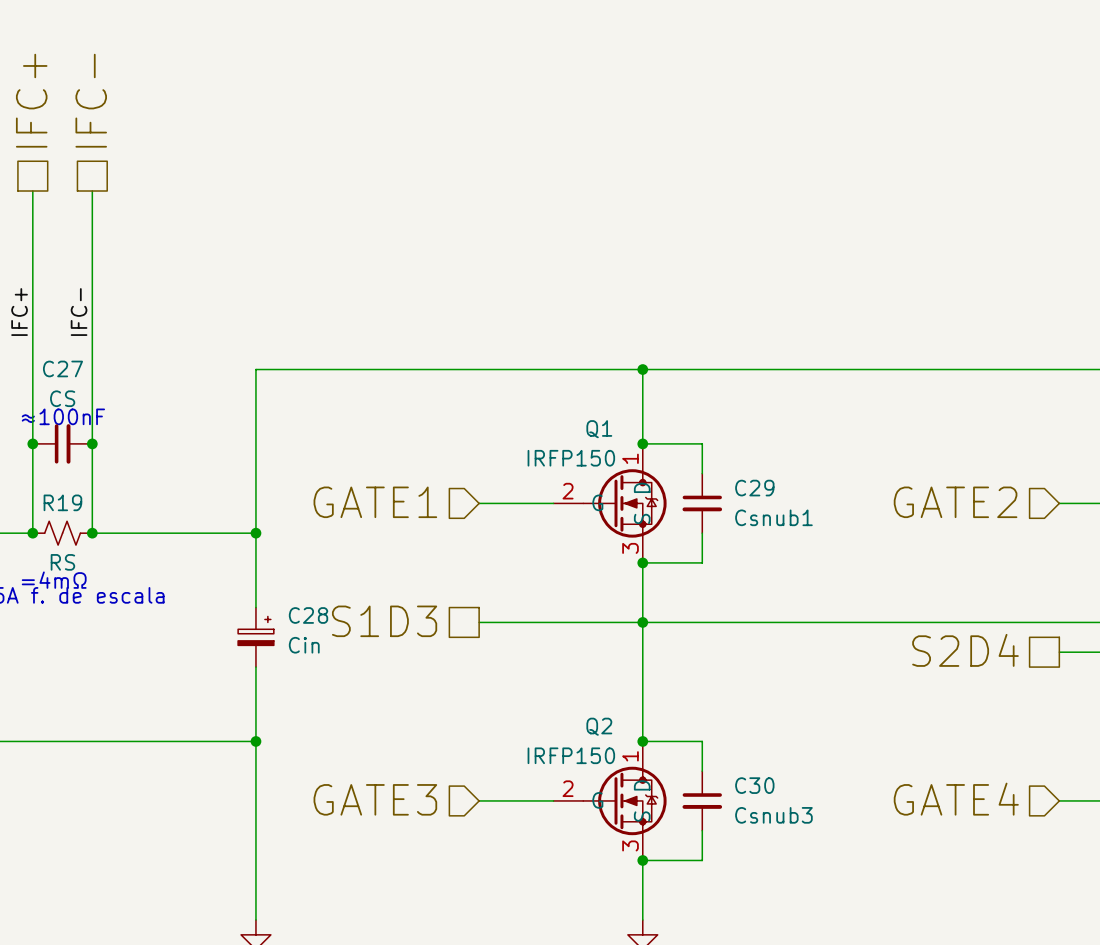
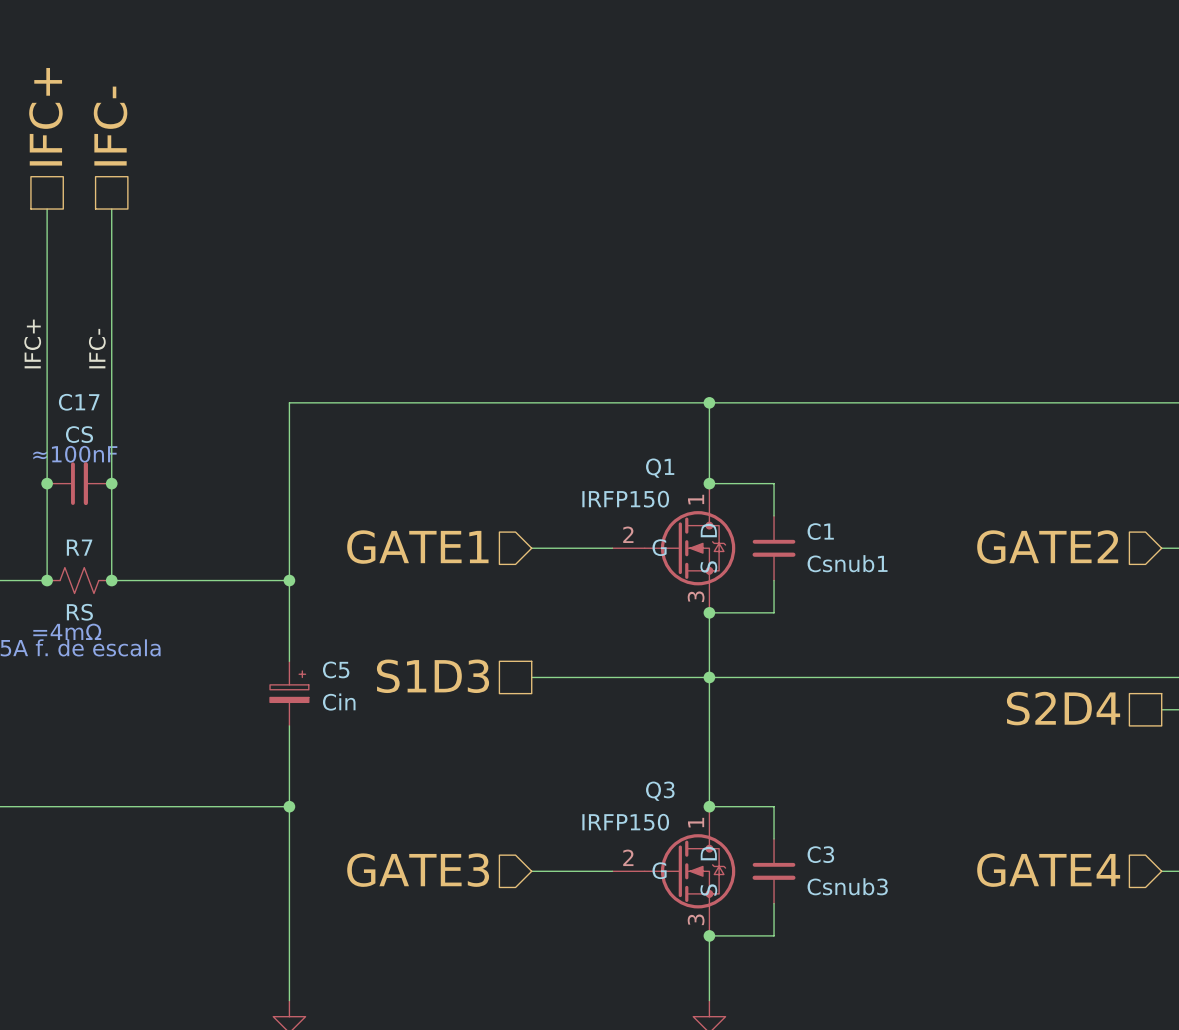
C27 name: C27 (63, 368) -> C17 (79, 402)
C29 name: C29 (754, 488) -> C1 (820, 531)
R19 name: R19 (62, 502) -> R7 (79, 547)
C28 name: C28 (308, 615) -> C5 (336, 669)
Q2 name: Q2 (599, 726) -> Q3 (660, 791)
C30 name: C30 (754, 785) -> C3 (820, 854)

